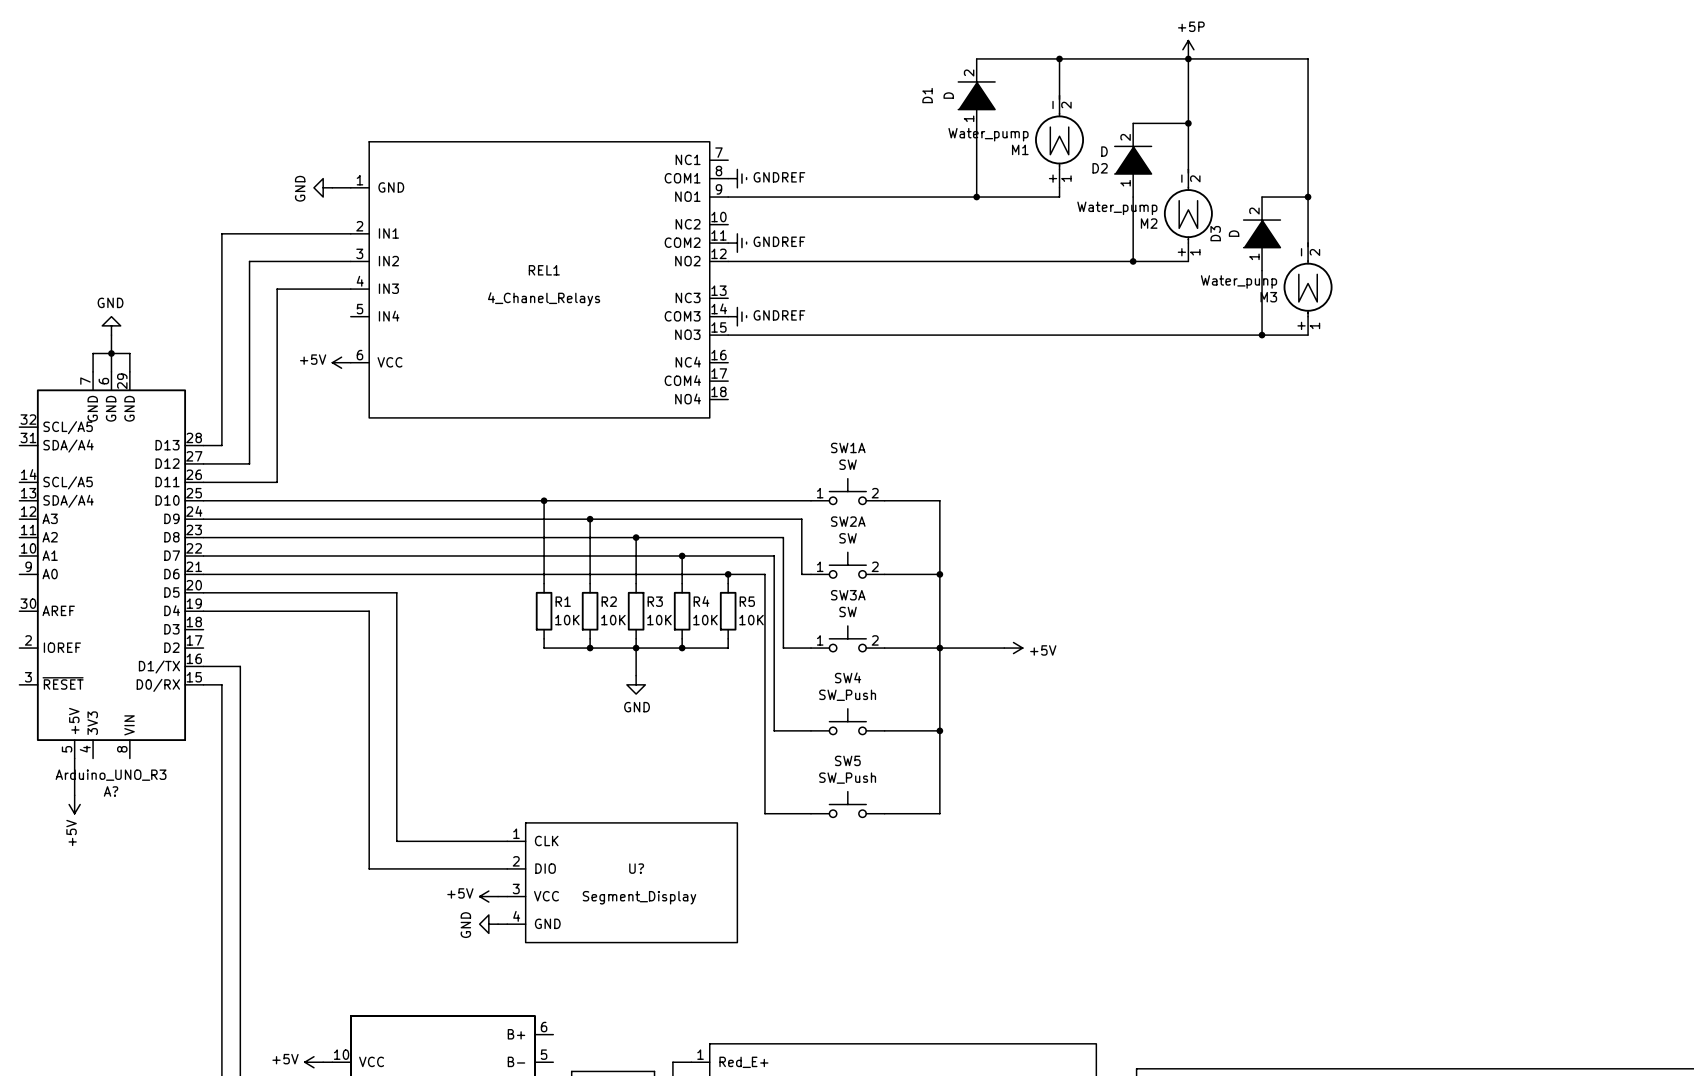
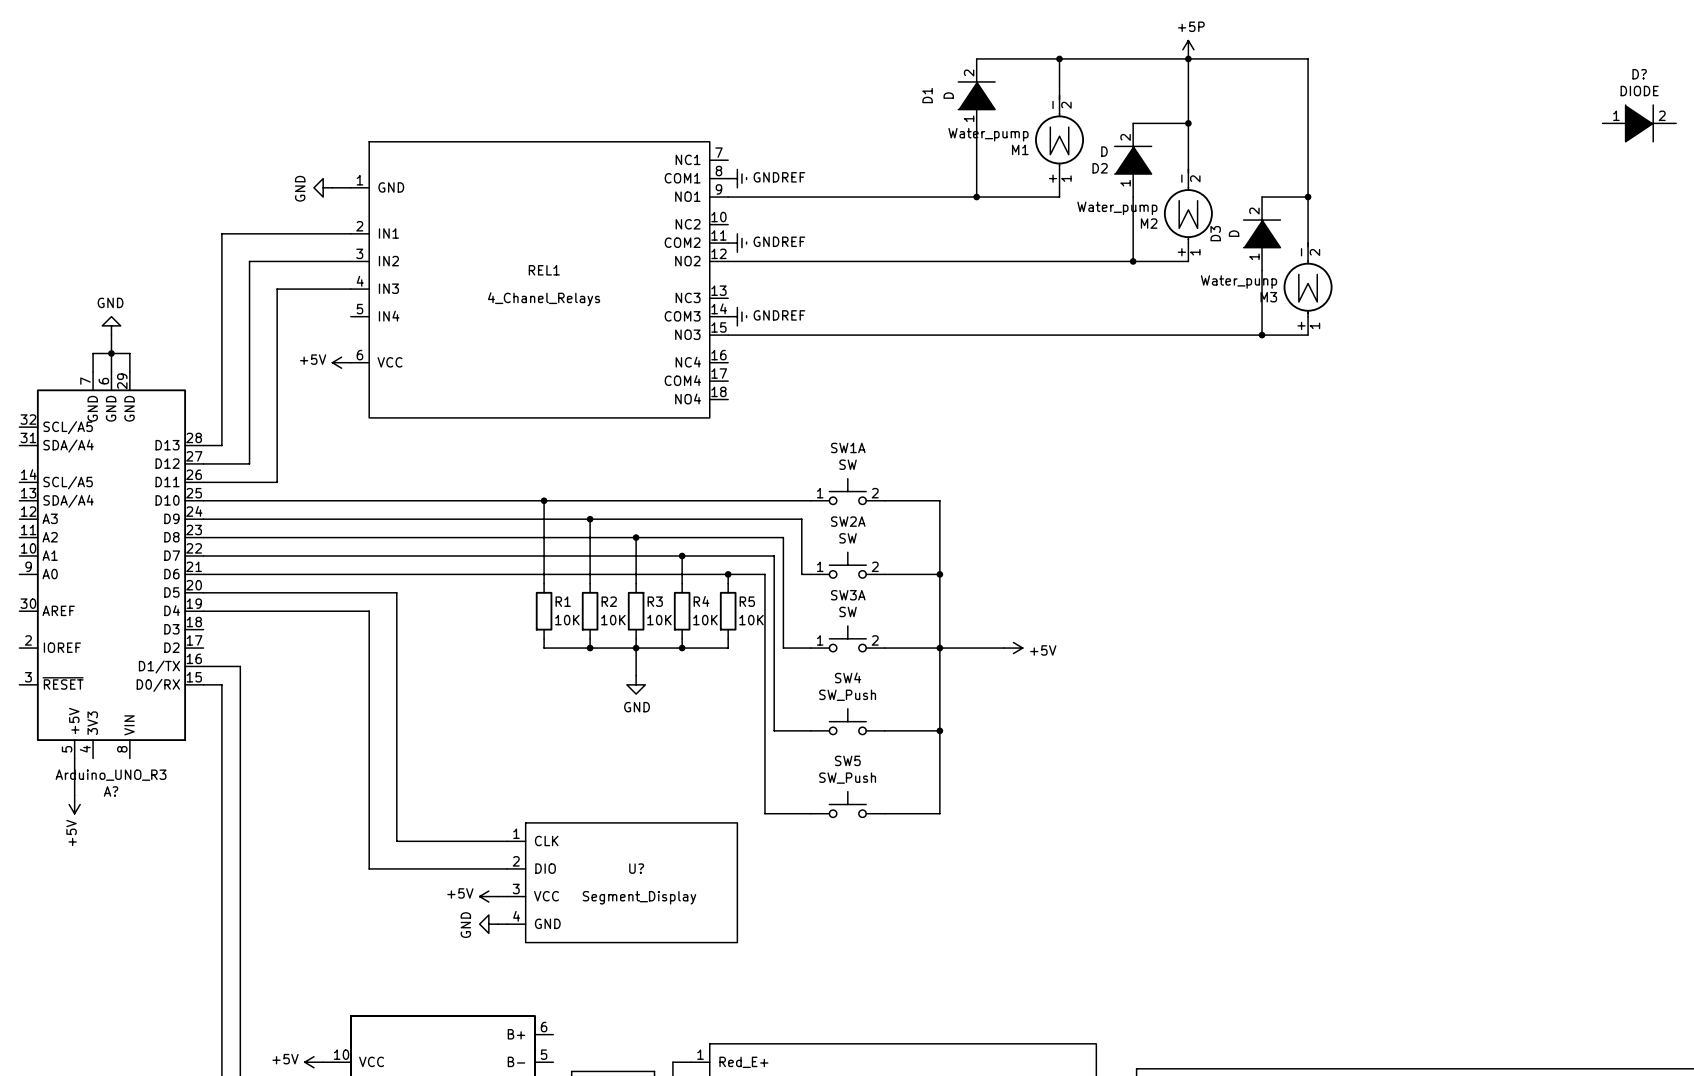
D?: none -> DIODE (1639, 123)

